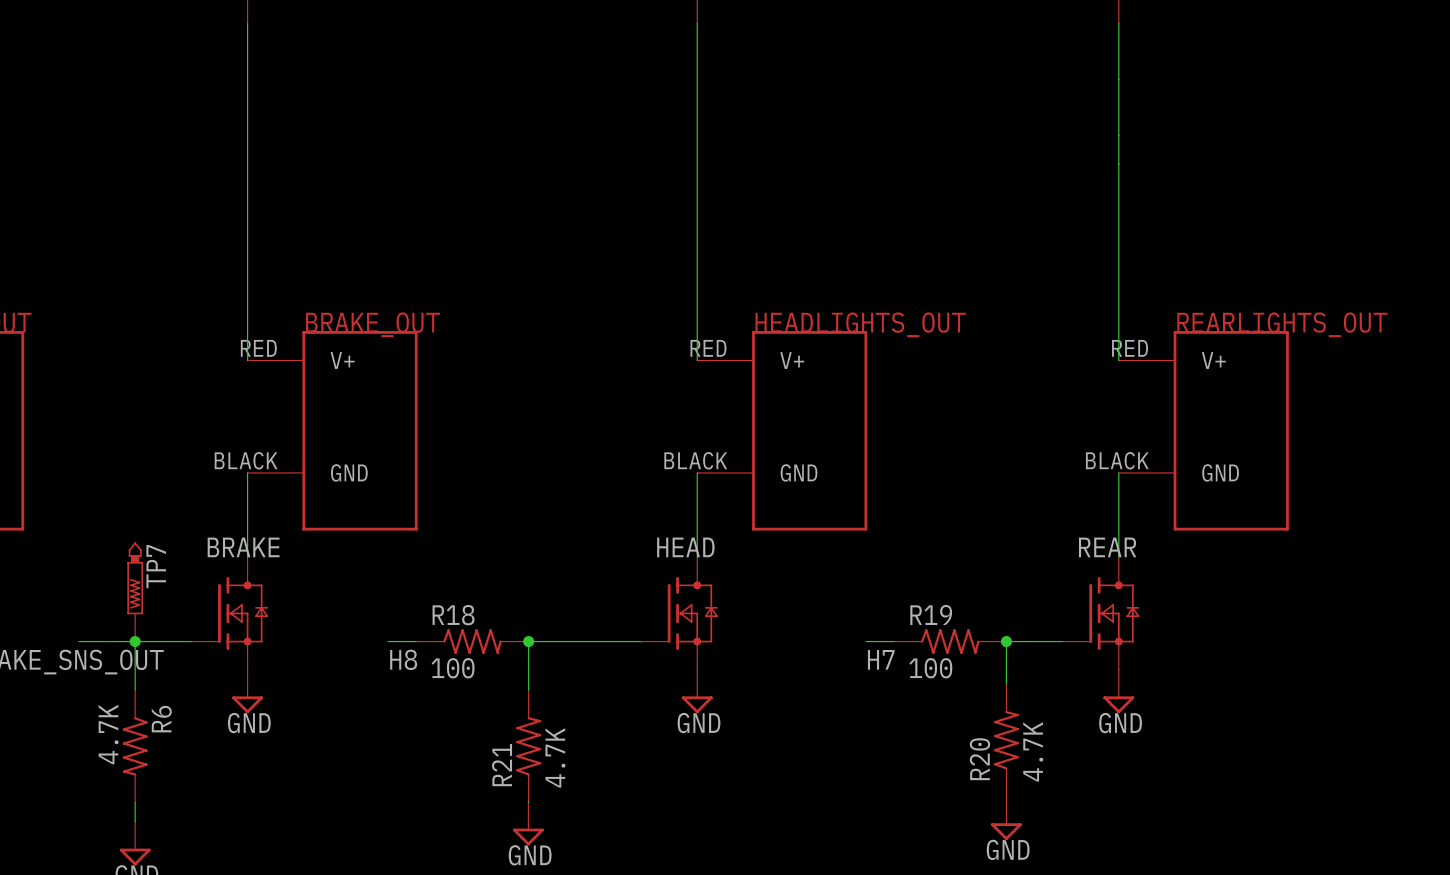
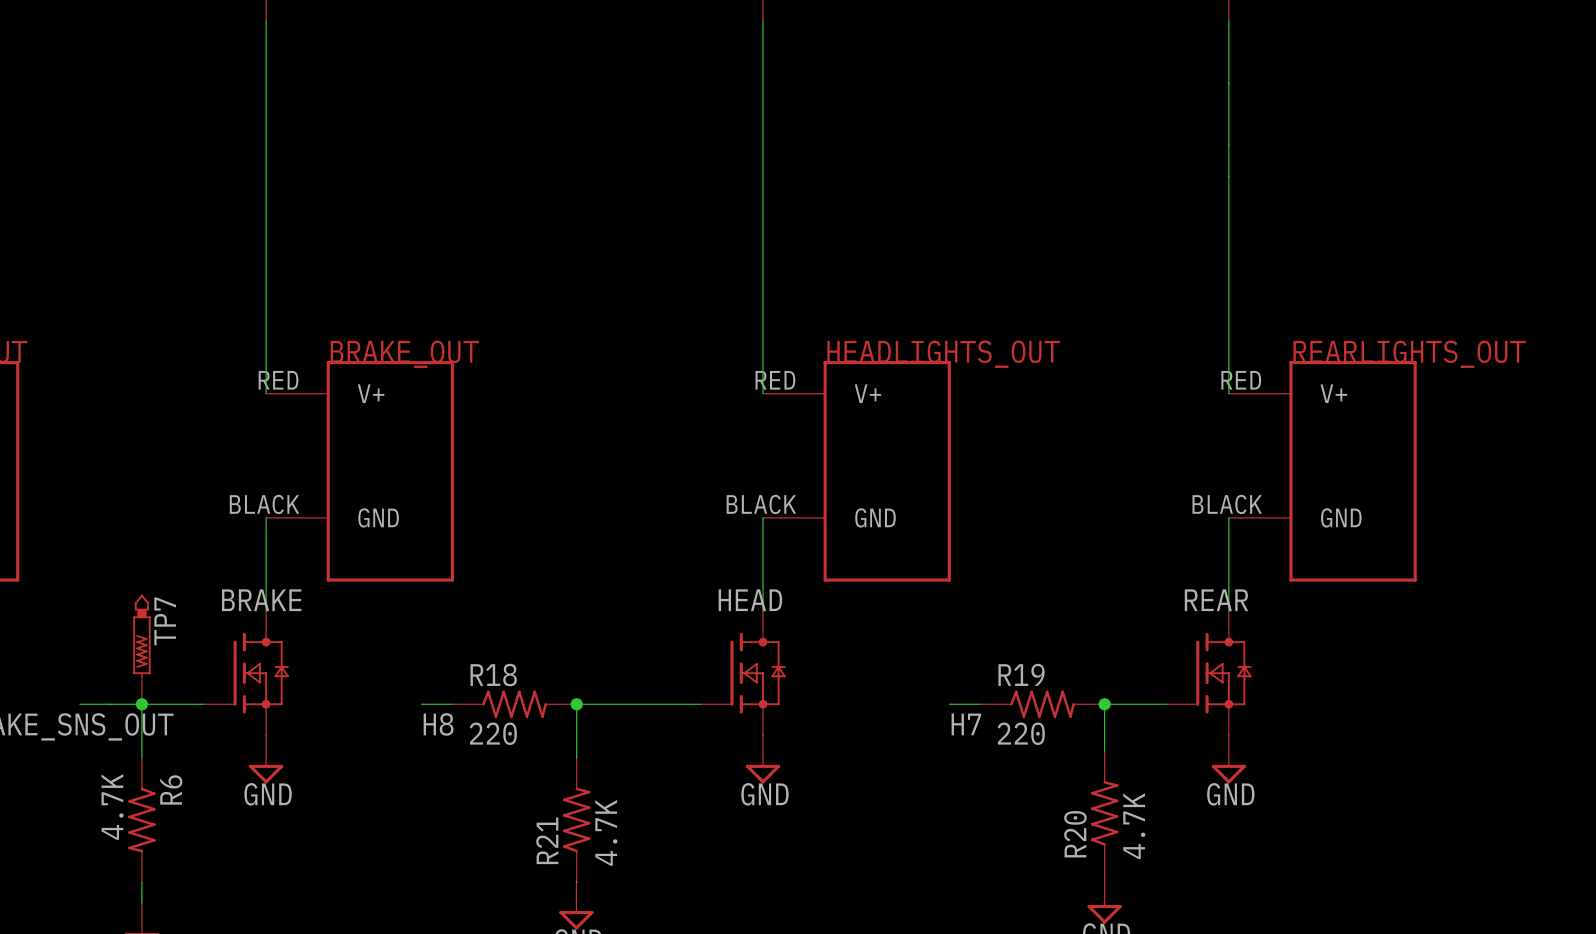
R18 value: 100 (453, 668) -> 220 (493, 733)
R19 value: 100 (930, 668) -> 220 (1021, 733)

